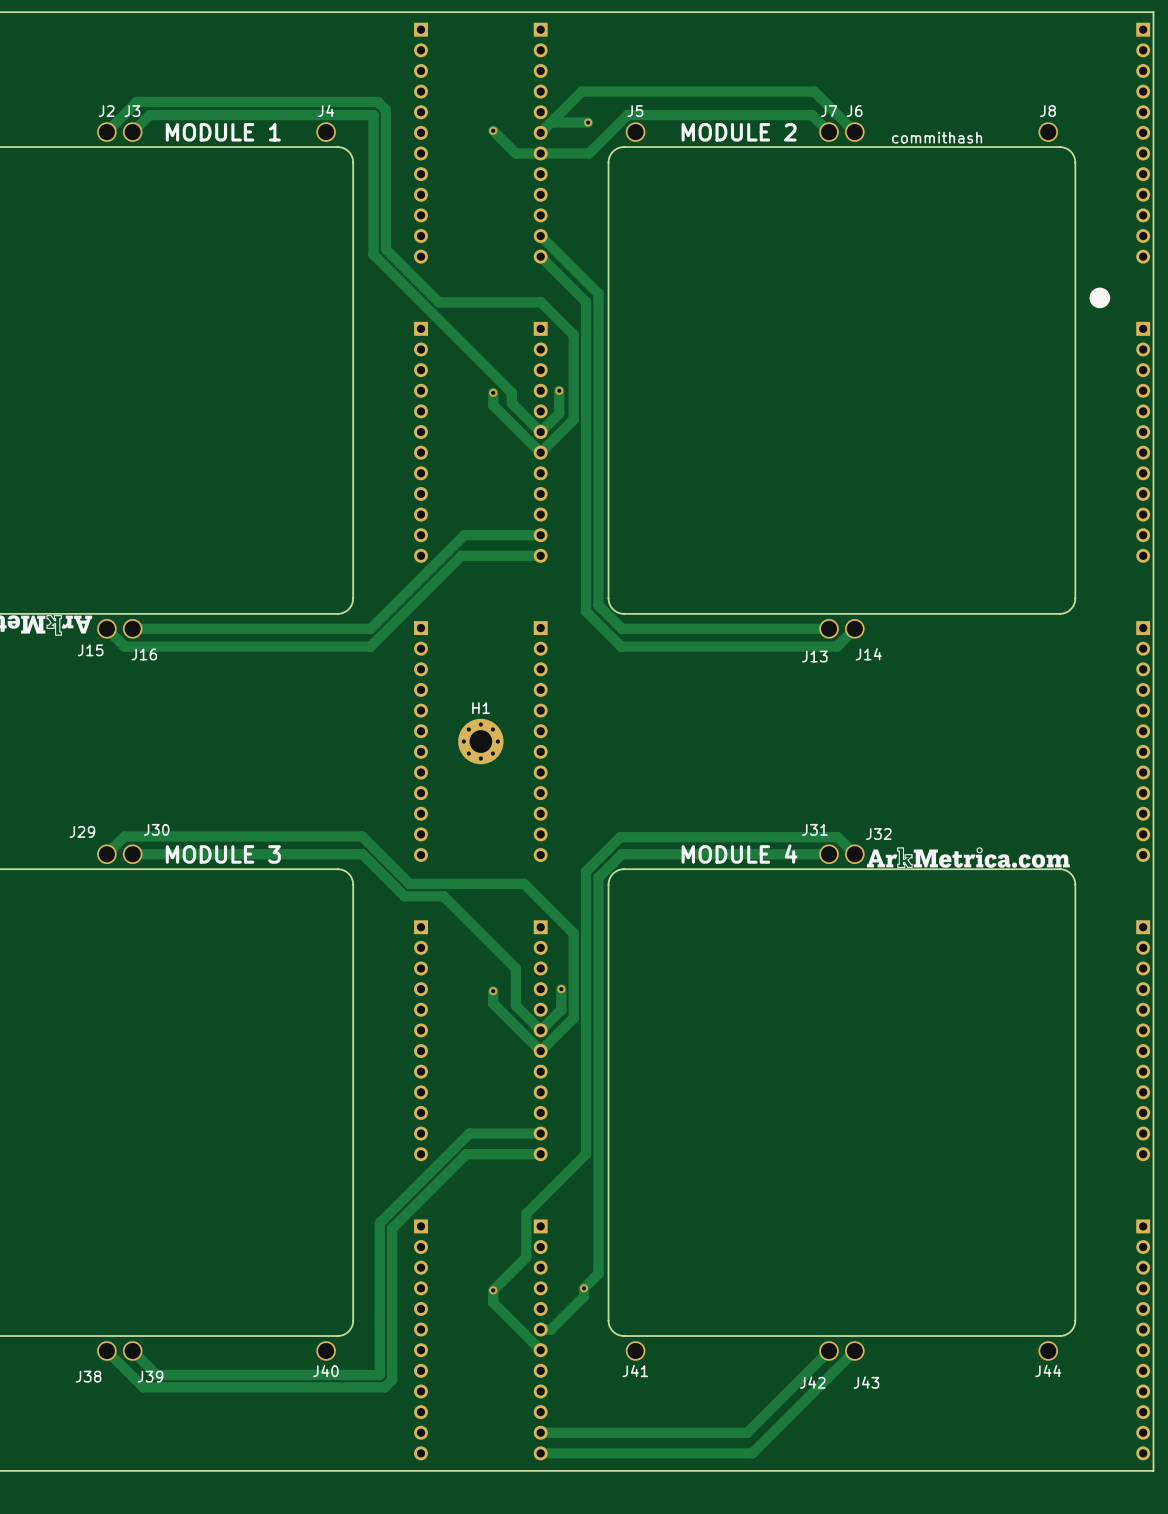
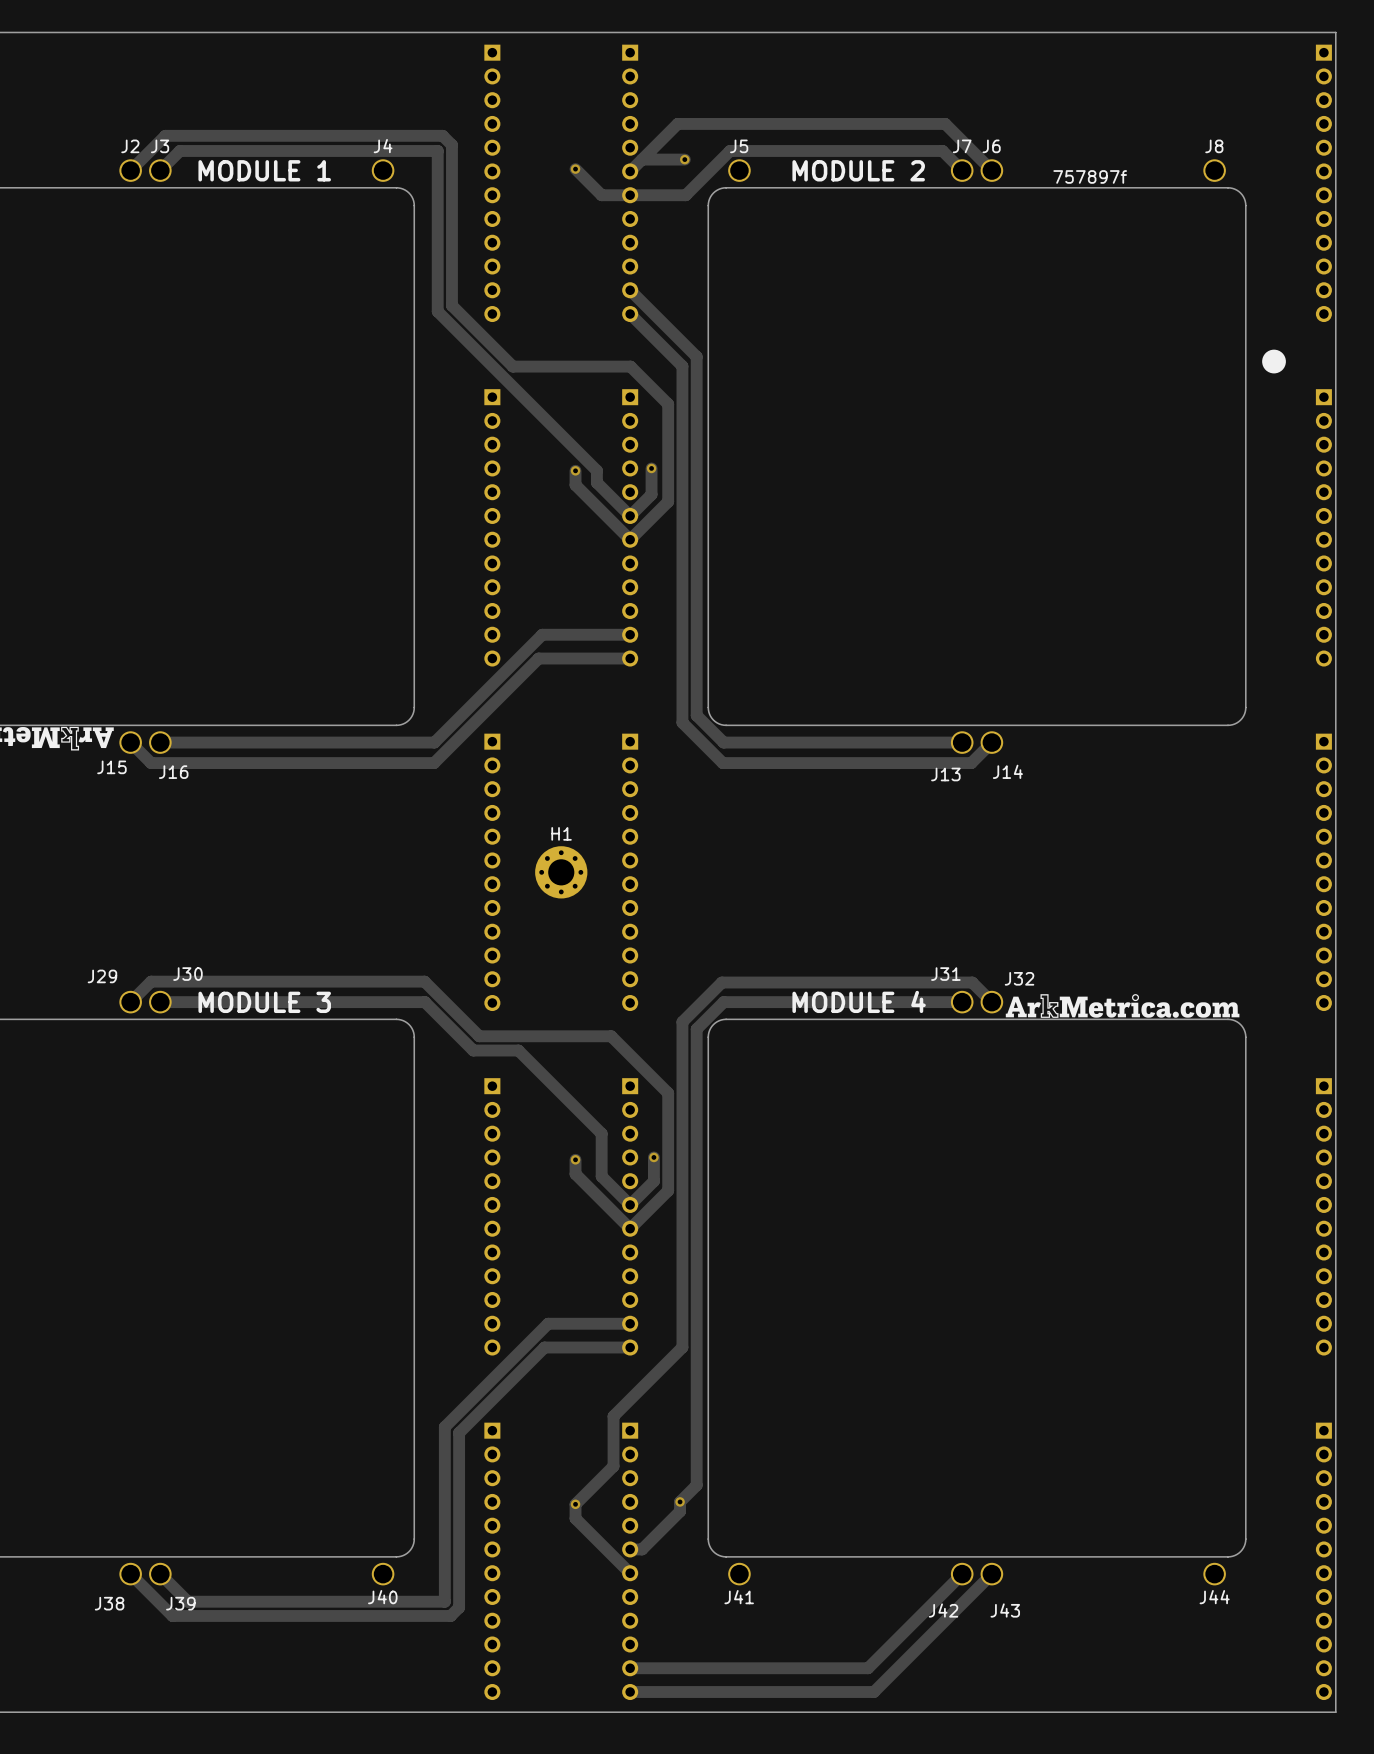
text: commithash (937, 137) -> 757897f (1090, 176)

